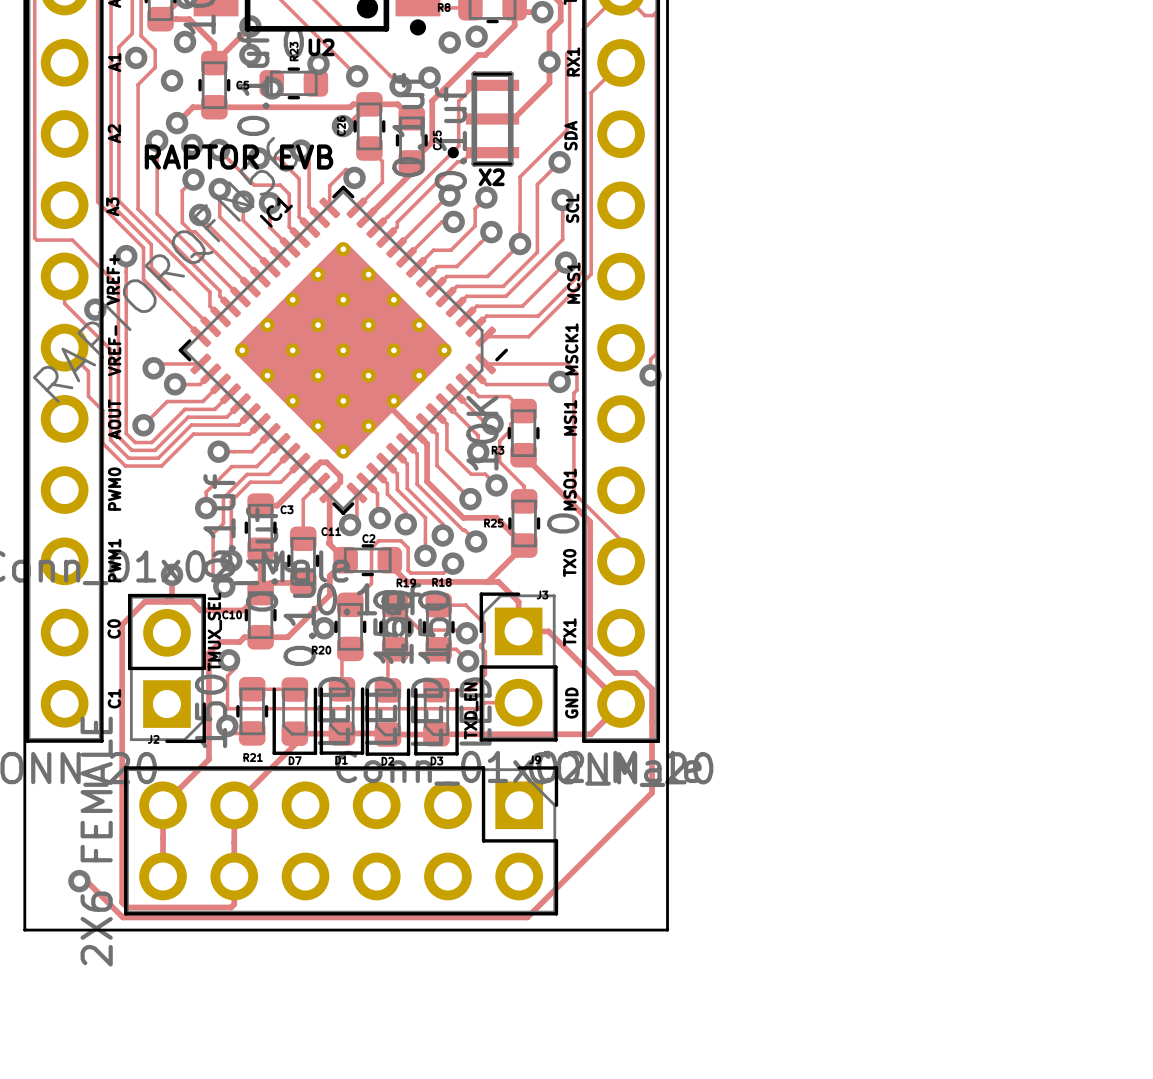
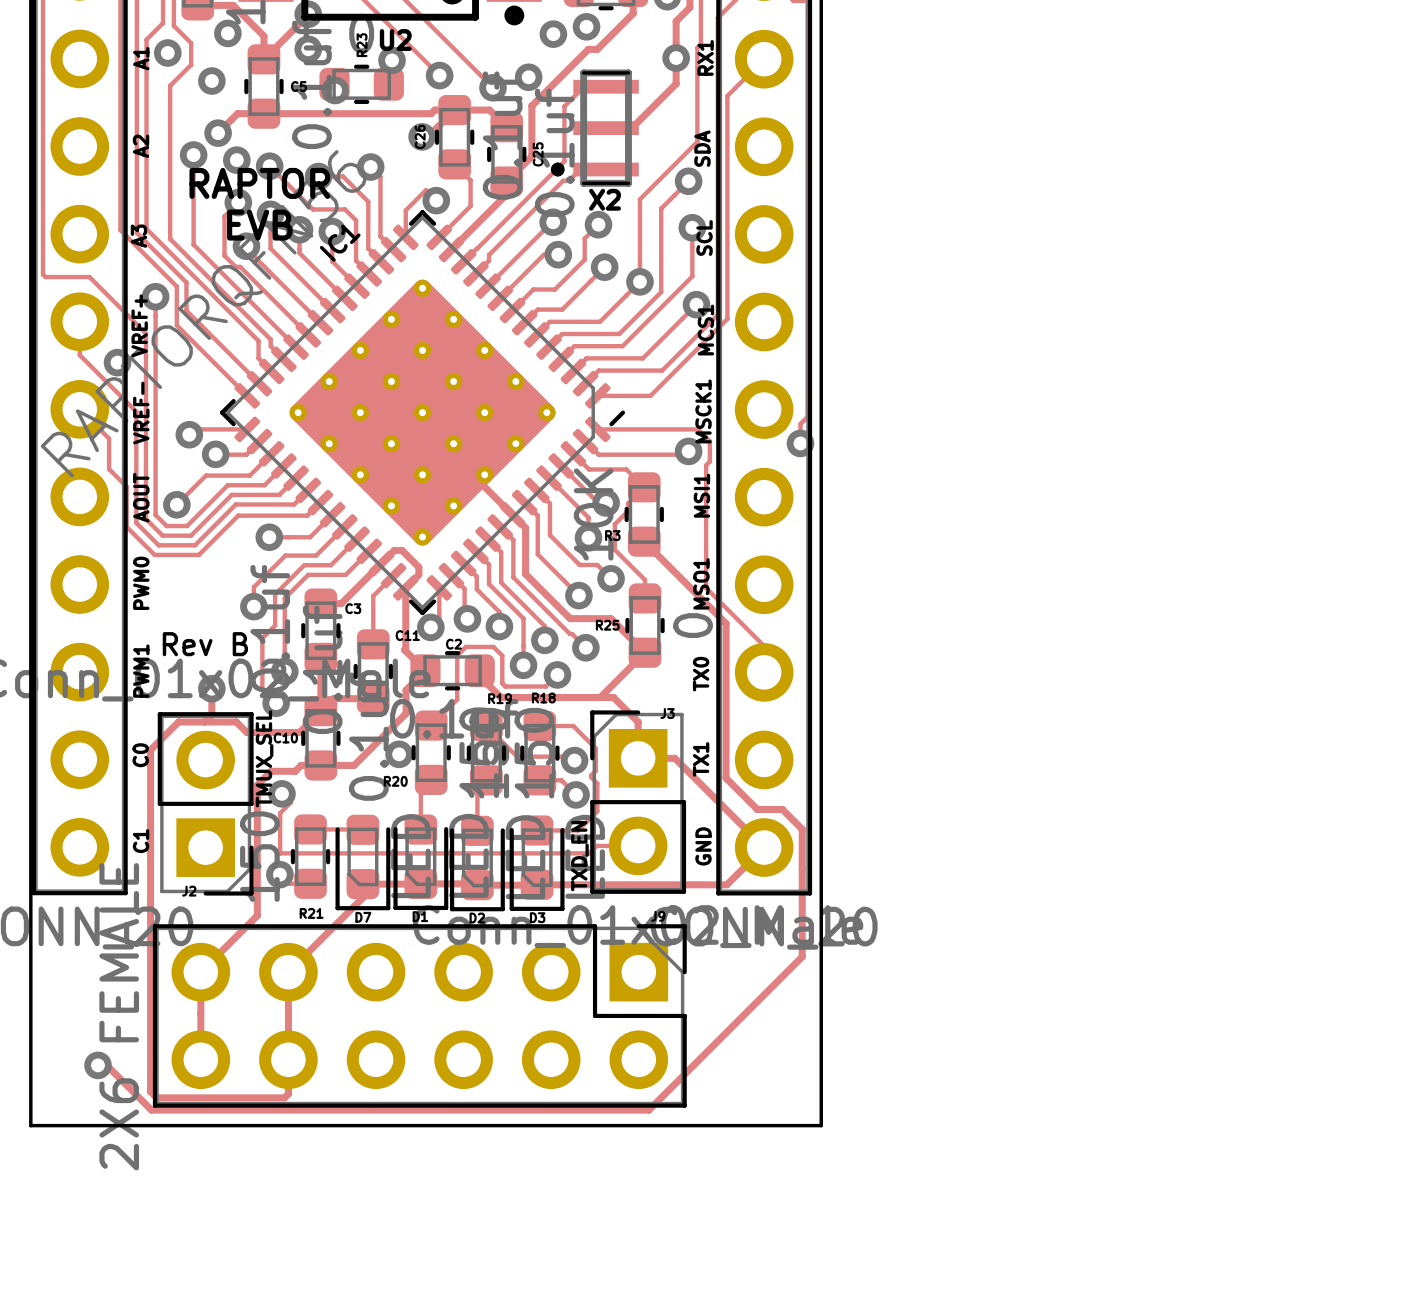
text: RAPTOR EVB (238, 157) -> RAPTOR (259, 183)
text: none -> EVB (259, 225)
text: none -> Rev B (205, 644)

